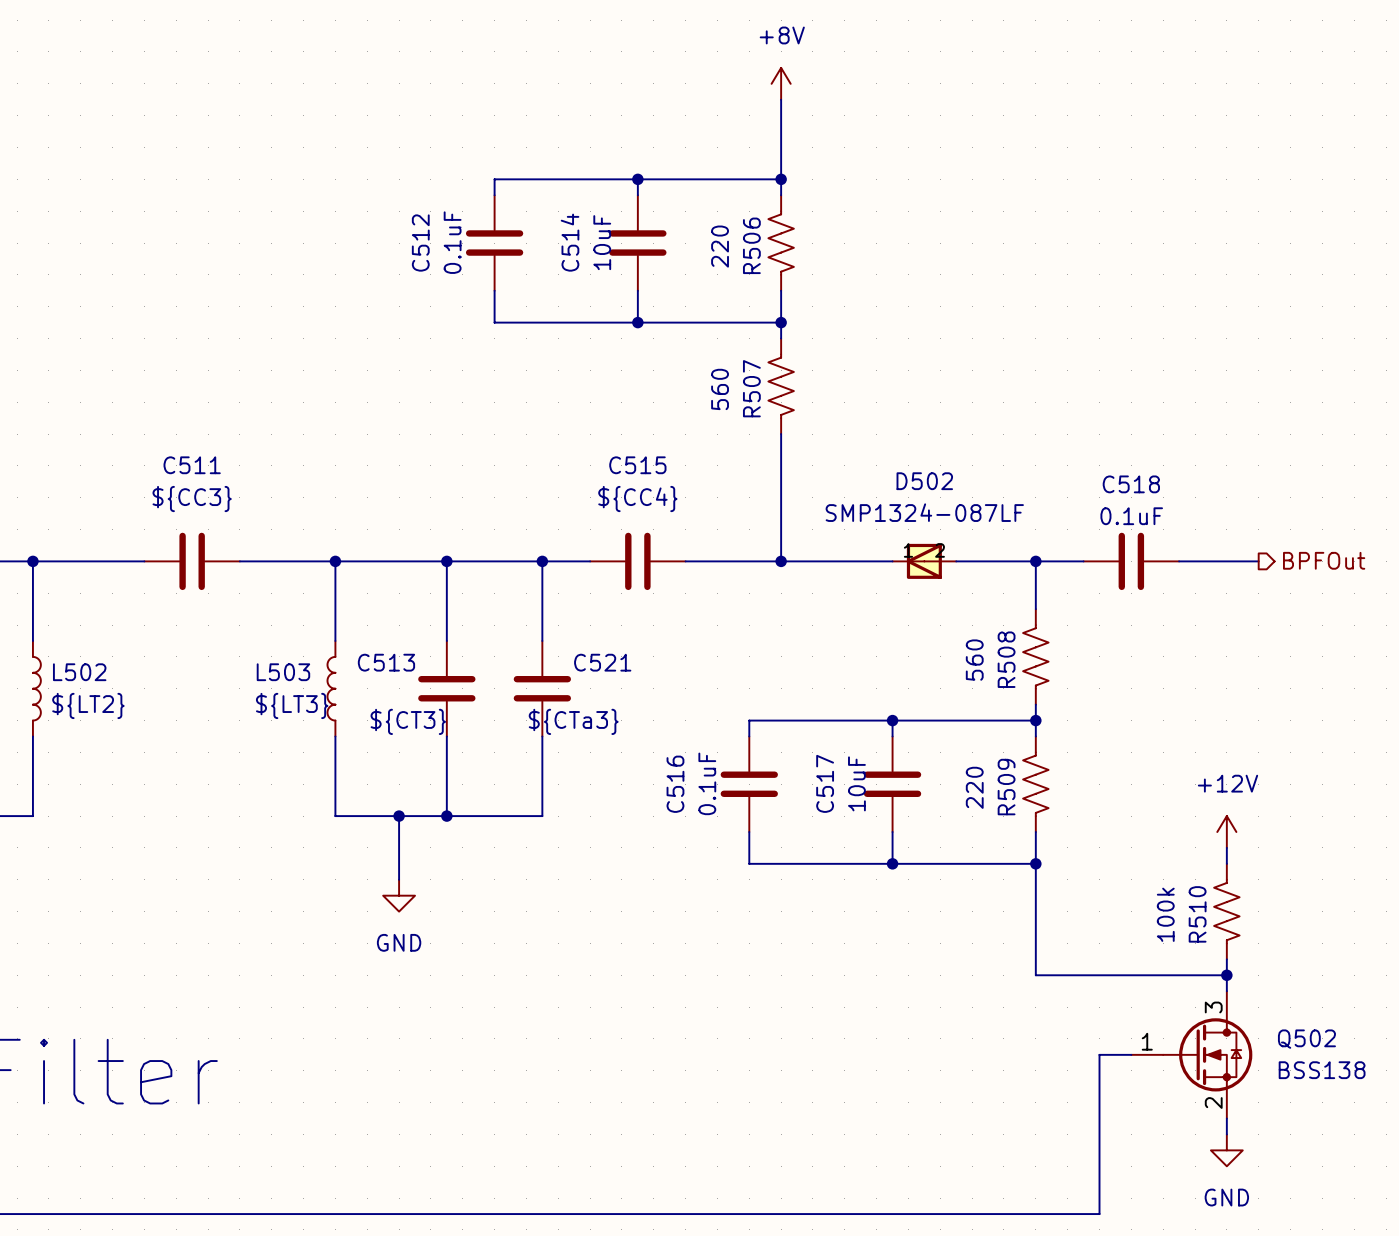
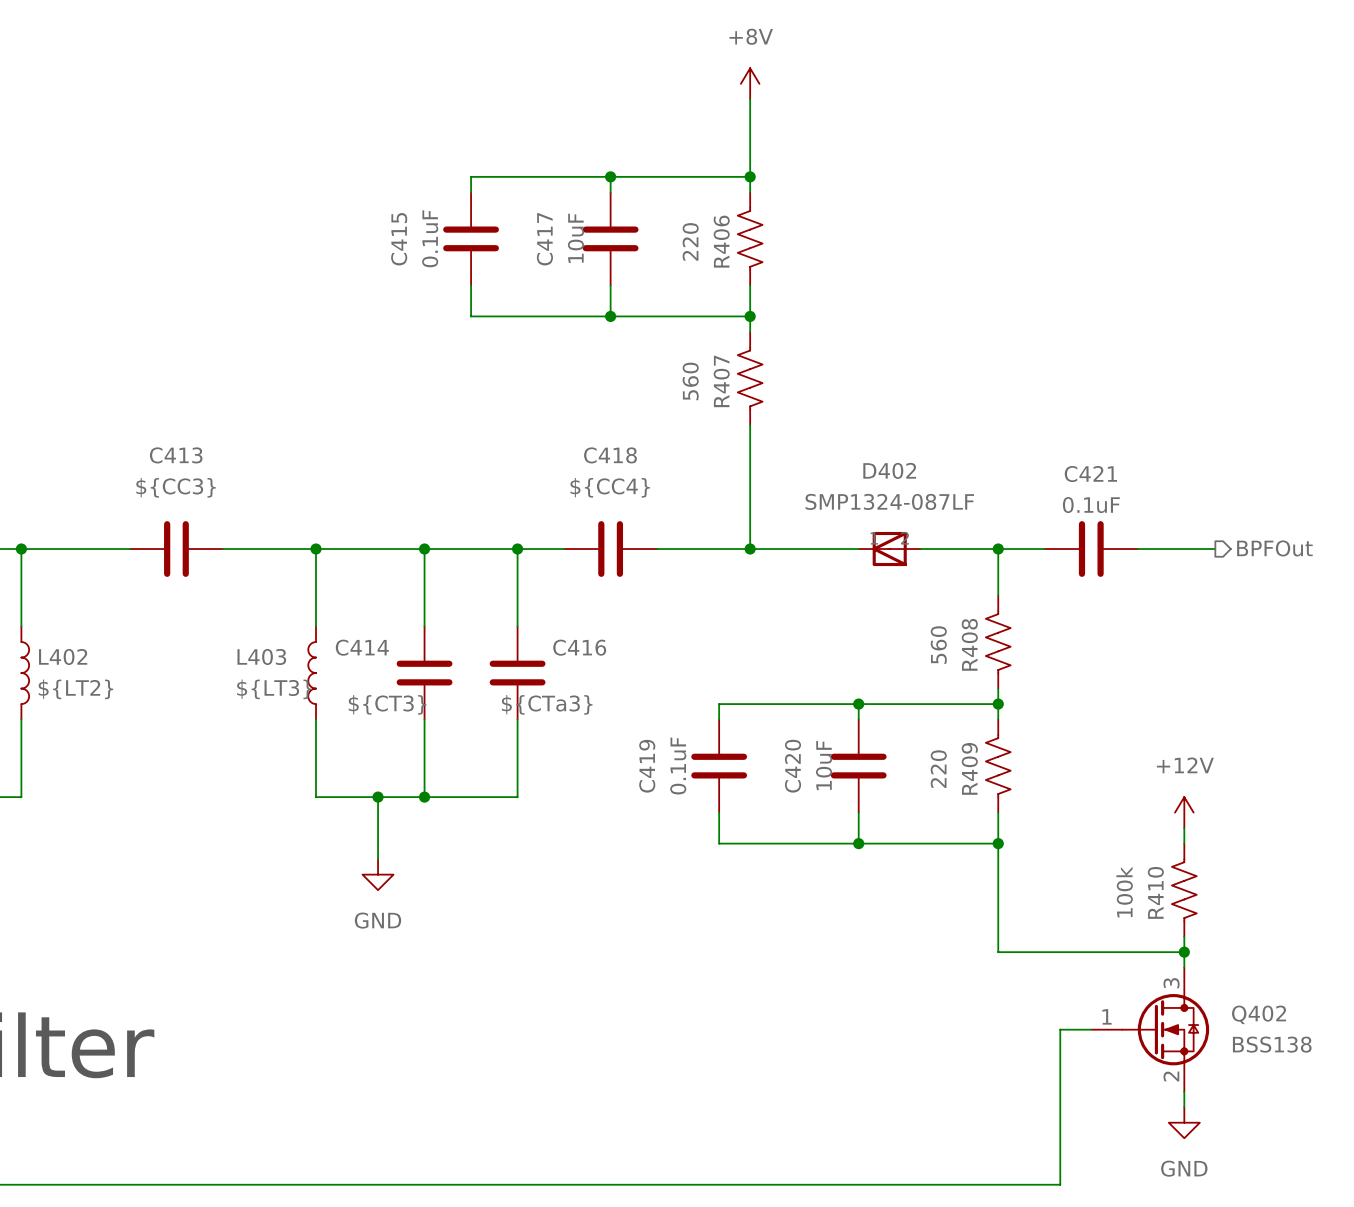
C514 name: C514 (570, 242) -> C417 (544, 239)
C512 name: C512 (420, 243) -> C415 (399, 239)
R506 name: R506 (751, 245) -> R406 (721, 241)
R507 name: R507 (751, 388) -> R407 (721, 381)
C511 name: C511 (192, 465) -> C413 (176, 455)
C515 name: C515 (637, 465) -> C418 (610, 455)
D502 name: D502 (924, 481) -> D402 (889, 470)
C518 name: C518 (1131, 484) -> C421 (1090, 474)
R508 name: R508 (1006, 659) -> R408 (969, 644)
C513 name: C513 (386, 662) -> C414 (362, 647)
C521 name: C521 (602, 662) -> C416 (579, 647)
L502 name: L502 (79, 672) -> L402 (63, 656)
L503 name: L503 (283, 672) -> L403 (261, 656)
C517 name: C517 (825, 783) -> C420 (793, 766)
C516 name: C516 (675, 784) -> C419 (647, 766)
R509 name: R509 (1006, 787) -> R409 (969, 768)
R510 name: R510 (1197, 914) -> R410 (1155, 892)
Q502 name: Q502 (1306, 1039) -> Q402 (1259, 1014)

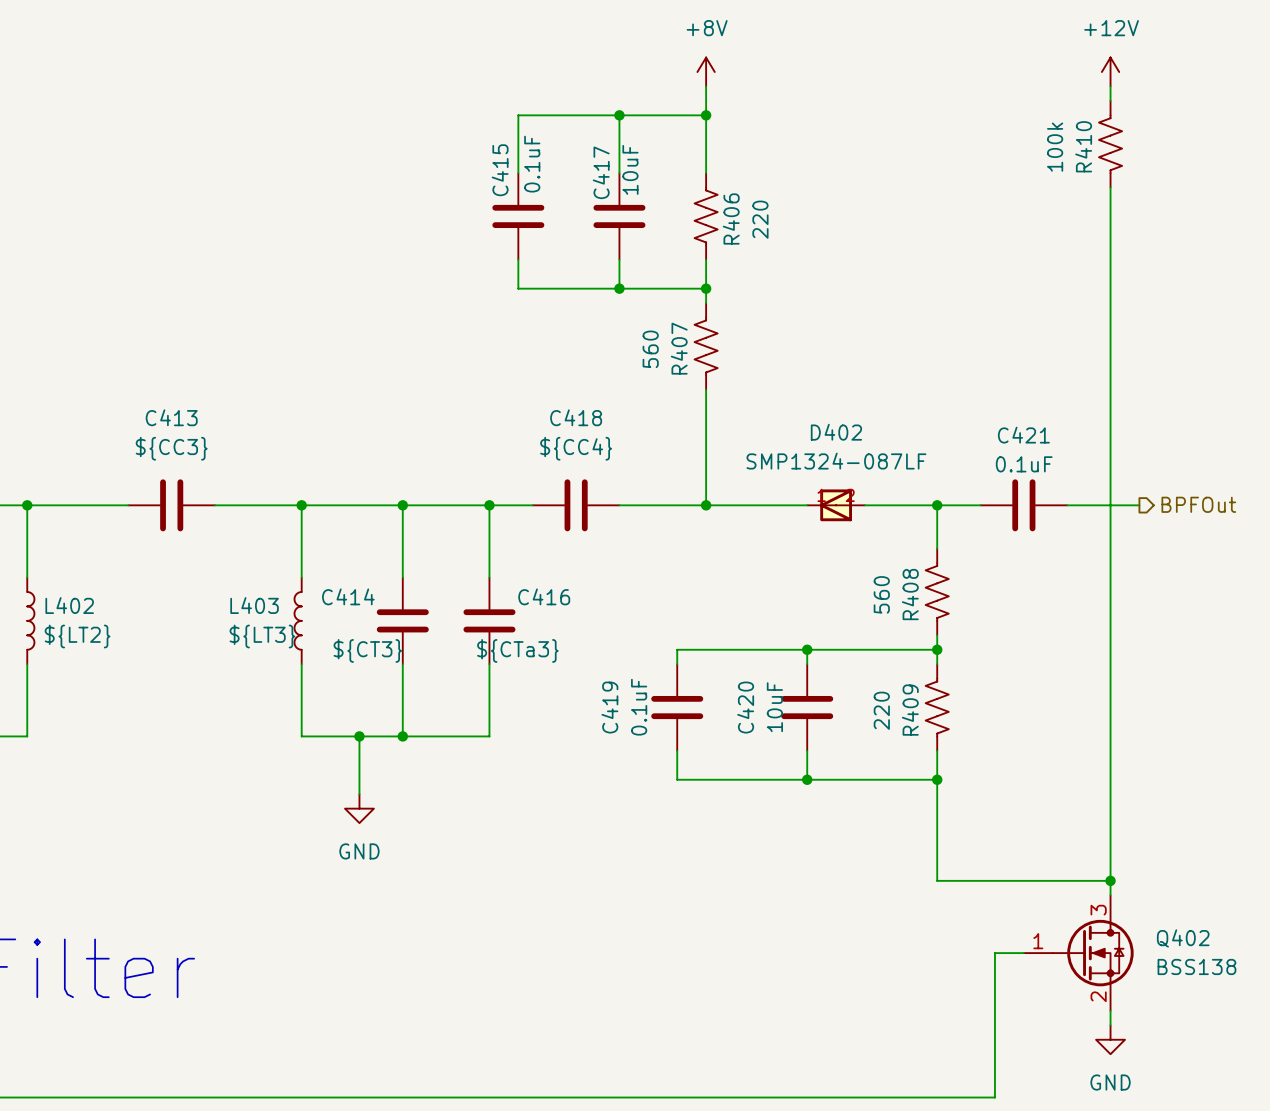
power symbol: none -> +12V (1110, 72)
wire: none -> (1110, 86) (1110, 100)
wire: none -> (619, 115) (619, 173)
junction: none -> (619, 115)
wire: none -> (706, 115) (518, 115) (518, 173)
wire: (610, 176) (610, 192) -> none
junction: (610, 176) -> none
wire: (750, 176) (471, 176) (471, 192) -> none
junction position: (750, 176) -> (706, 115)
wire: none -> (1110, 187) (1110, 765)
C415 value position: 0.1uF (430, 238) -> 0.1uF (532, 164)
C415 position: (471, 238) -> (518, 216)
C417 value position: 10uF (575, 238) -> 10uF (630, 169)
C417 position: (610, 238) -> (619, 216)
R406 flip: as is (750, 238) -> left-right (706, 216)
C415 name position: C415 (399, 239) -> C415 (500, 170)
C417 name position: C417 (544, 239) -> C417 (601, 172)
wire: (471, 285) (471, 316) (548, 316) -> (518, 259) (518, 288)
wire: (610, 285) (610, 316) -> (619, 259) (619, 288)
junction position: (610, 316) -> (619, 288)
power symbol: +12V (1184, 812) -> none
R410 position: (1184, 890) -> (1110, 144)

